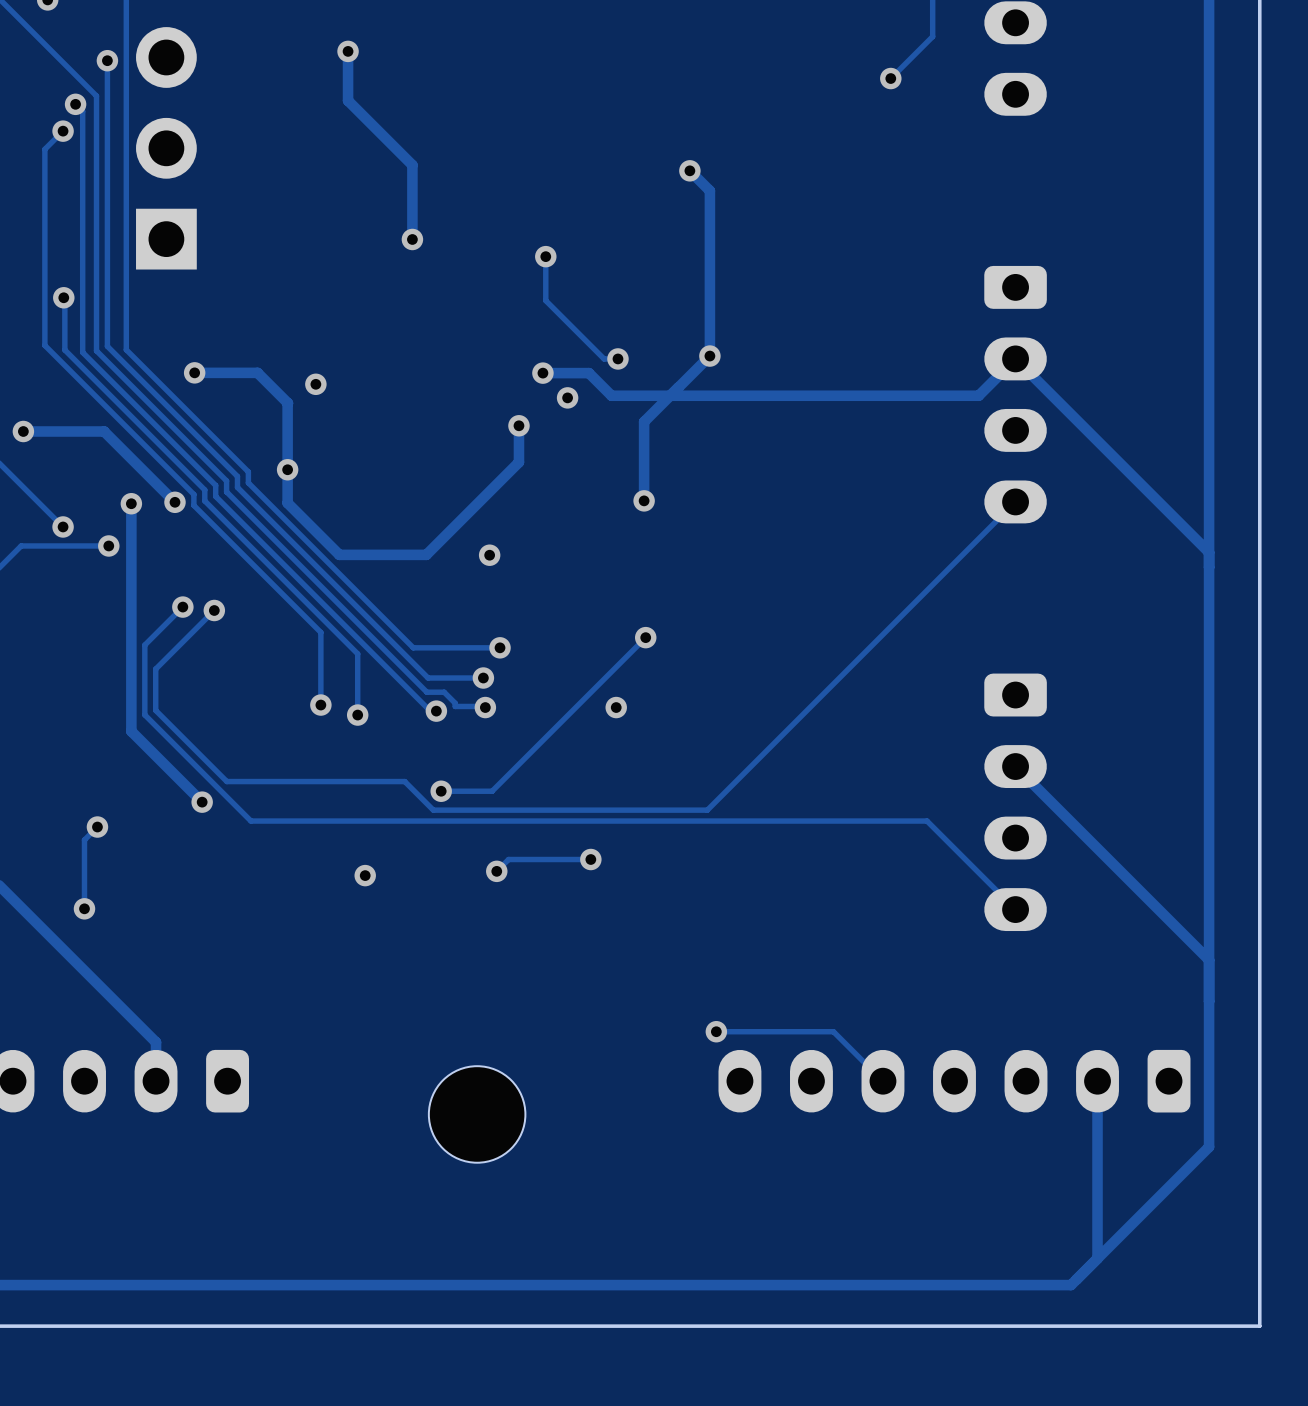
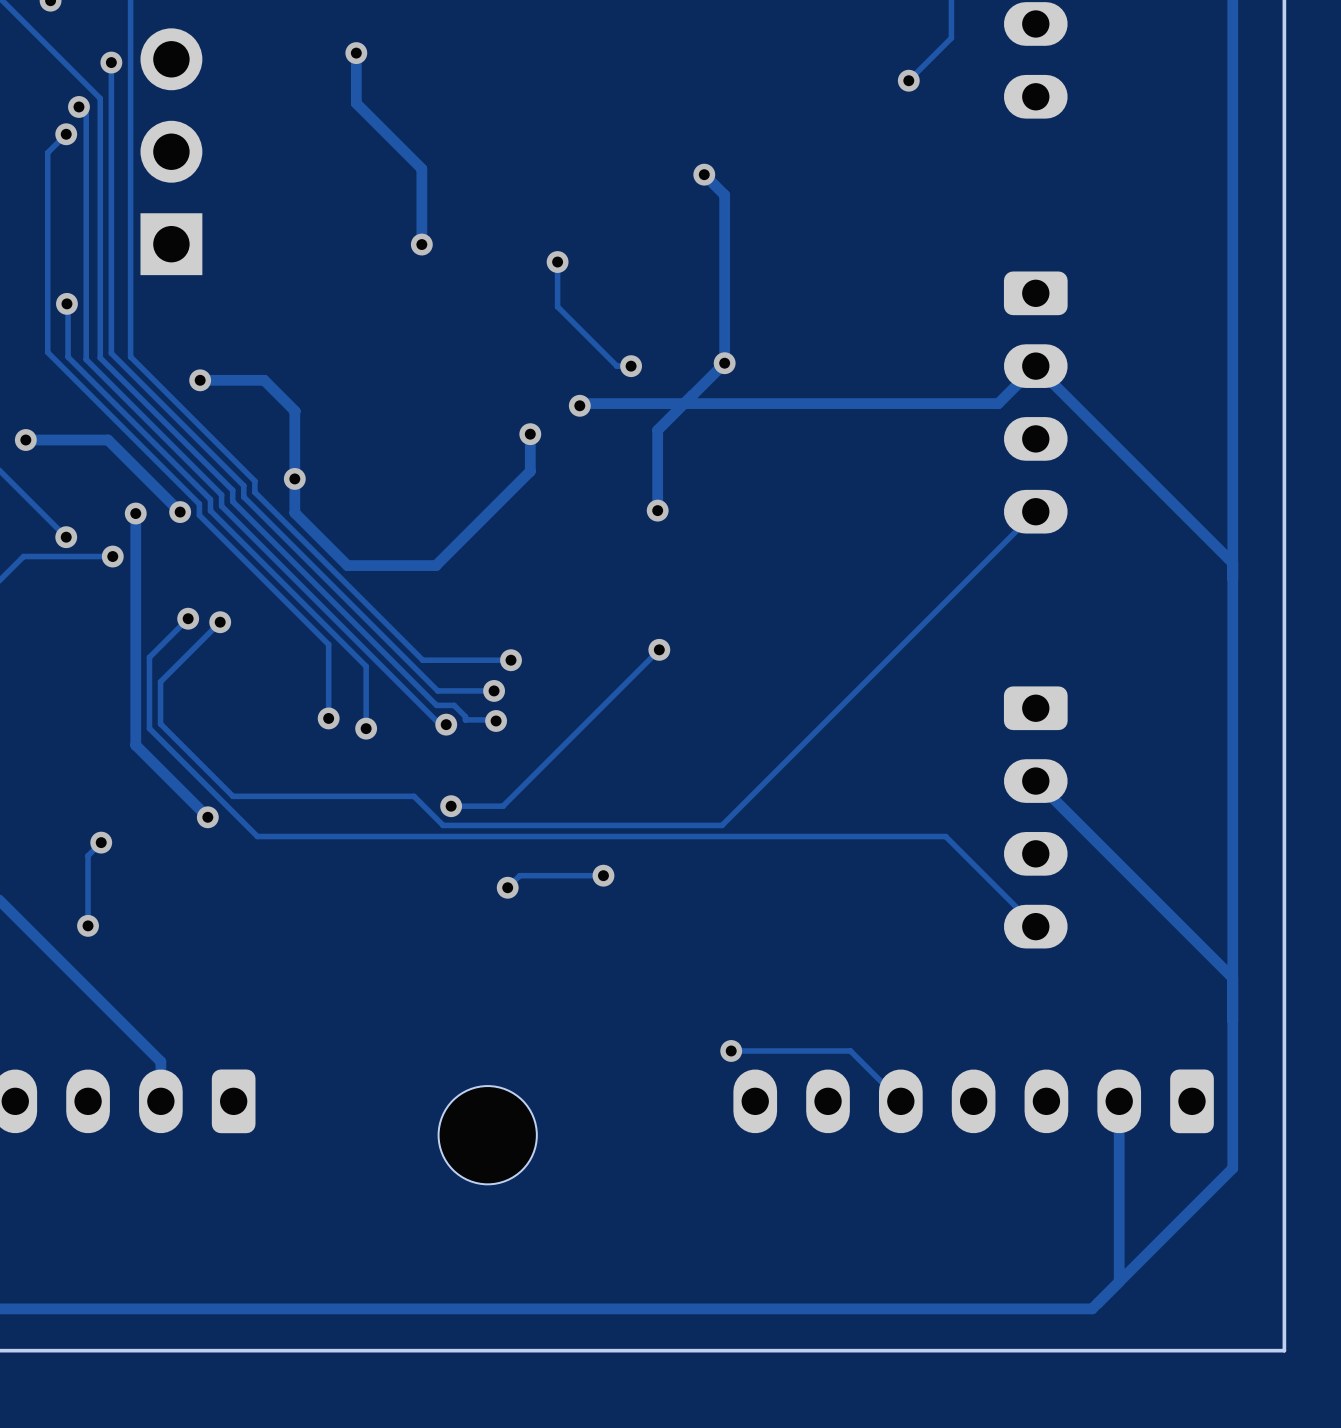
track: (542, 373) (588, 373) (611, 395) -> (580, 403) (624, 403)
via: (542, 373) -> none
via: (315, 384) -> none
via: (489, 555) -> none
via: (616, 707) -> none
via: (365, 875) -> none

